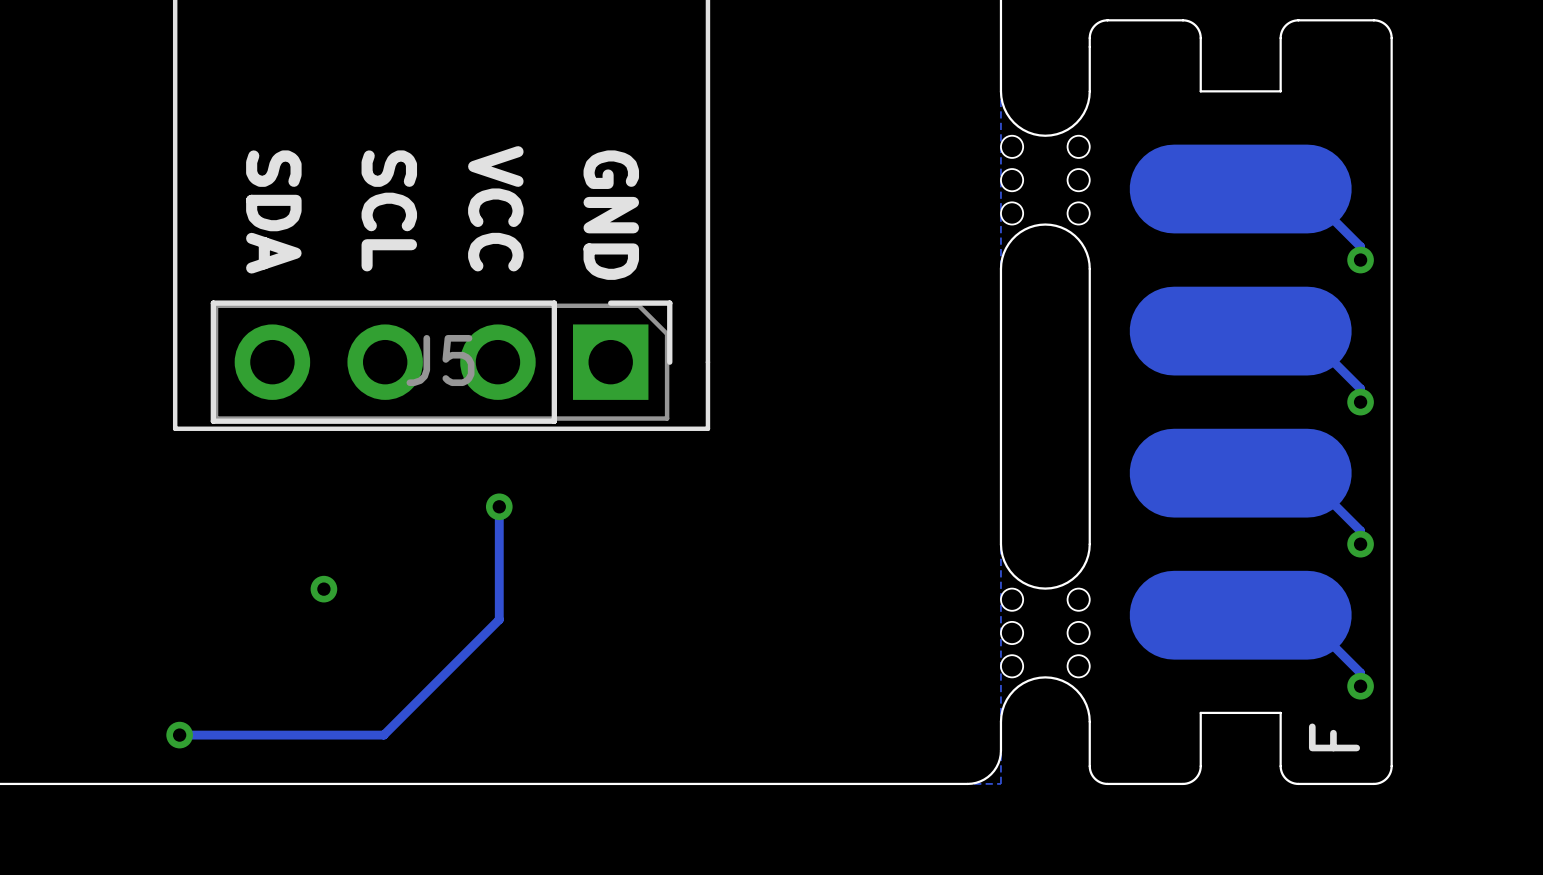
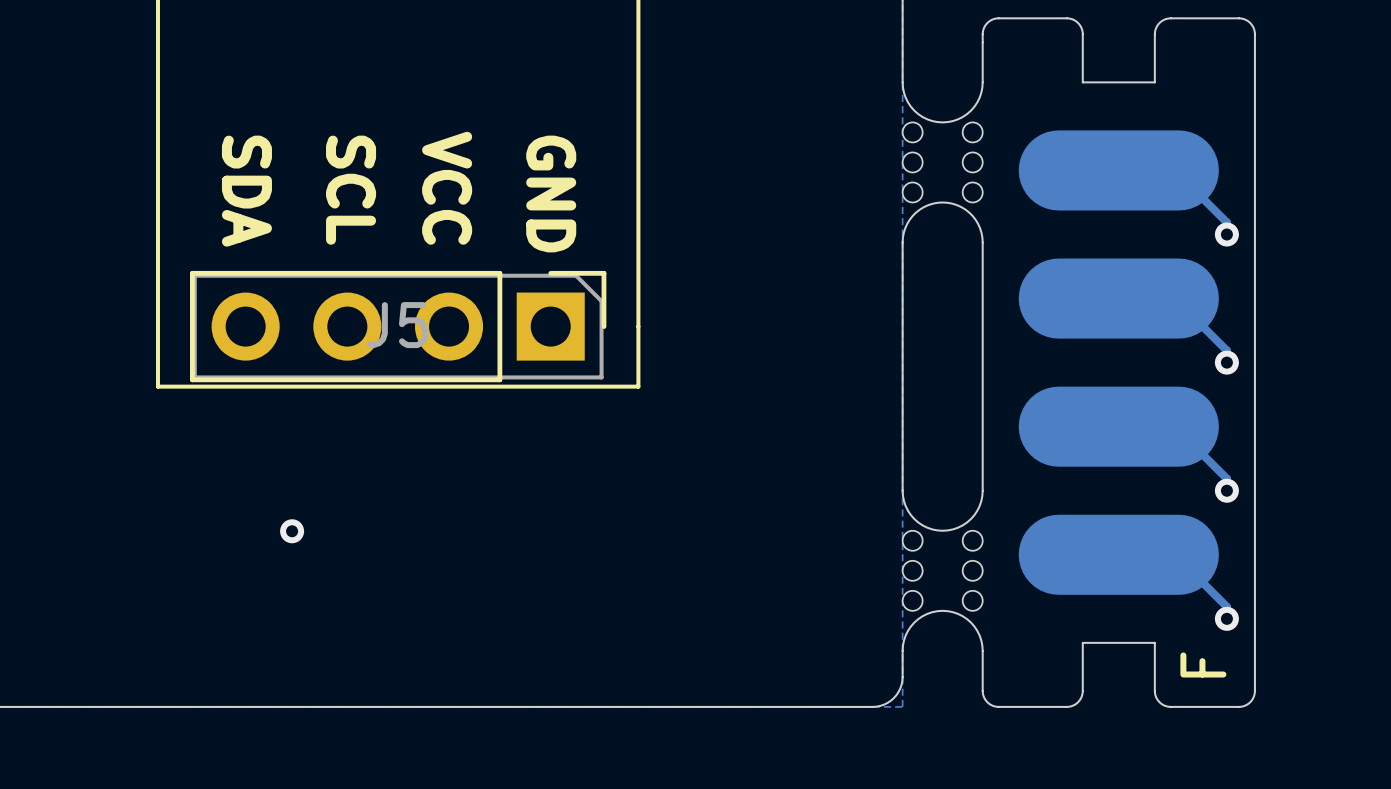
track: (499, 506) (499, 619) (383, 735) (179, 735) -> none
via: (499, 506) -> none
via: (179, 735) -> none

